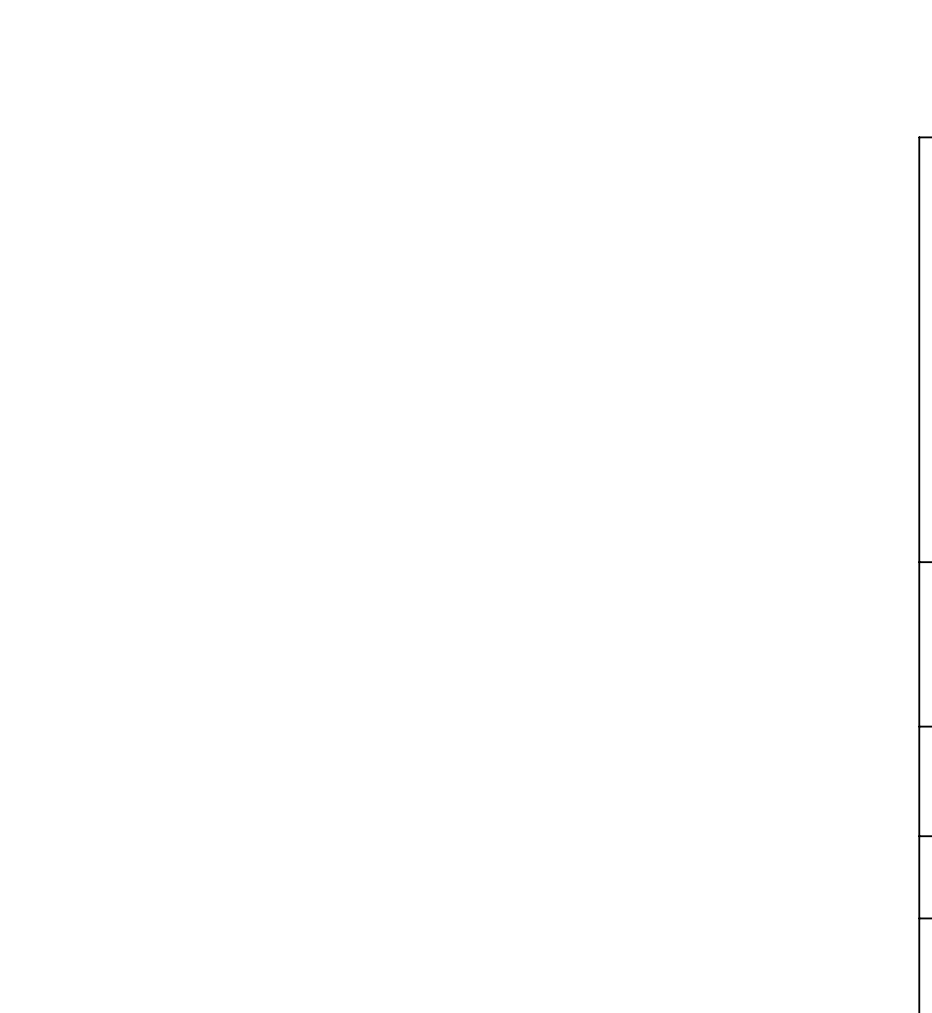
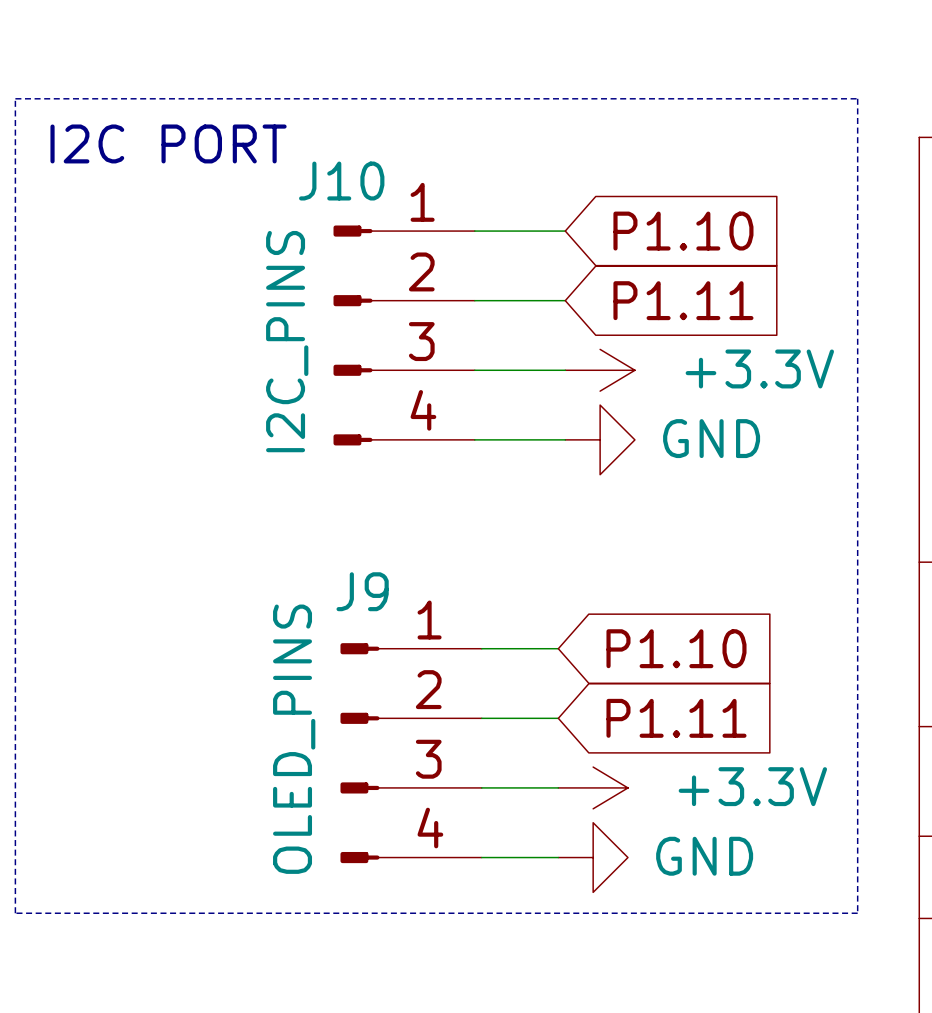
line: none -> (15, 98) (857, 98) (857, 913) (15, 913) (15, 98)
text: none -> I2C PORT (168, 143)
wire: none -> (474, 231) (565, 231)
global label: none -> P1.10 (683, 231)
wire: none -> (474, 300) (565, 300)
global label: none -> P1.11 (683, 300)
J10: none -> I2C_PINS (404, 335)
wire: none -> (474, 370) (565, 370)
power symbol: none -> +3.3V (600, 370)
wire: none -> (474, 439) (565, 439)
power symbol: none -> GND (600, 439)
wire: none -> (481, 648) (558, 648)
global label: none -> P1.10 (676, 648)
wire: none -> (481, 718) (558, 718)
global label: none -> P1.11 (676, 718)
J9: none -> OLED_PINS (411, 753)
wire: none -> (481, 787) (558, 787)
power symbol: none -> +3.3V (593, 787)
wire: none -> (481, 857) (558, 857)
power symbol: none -> GND (593, 857)

